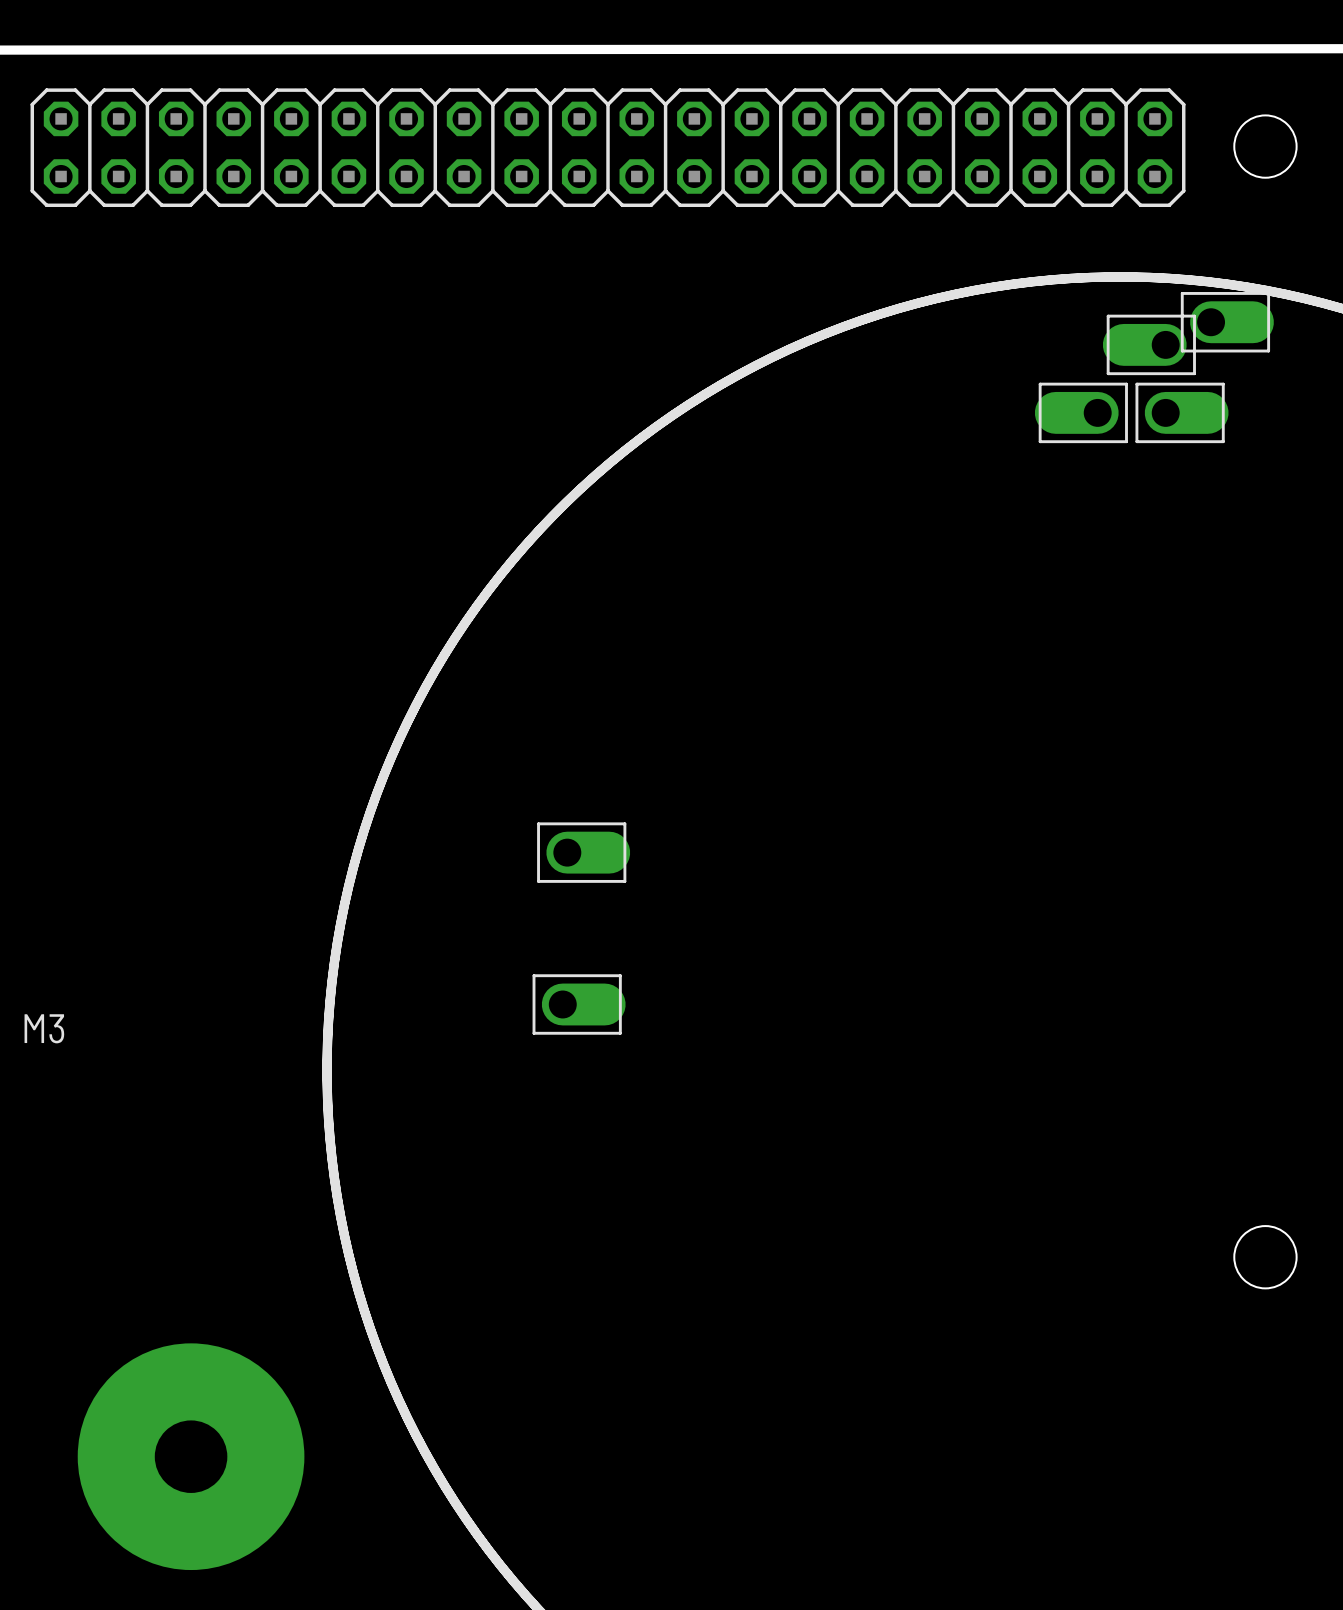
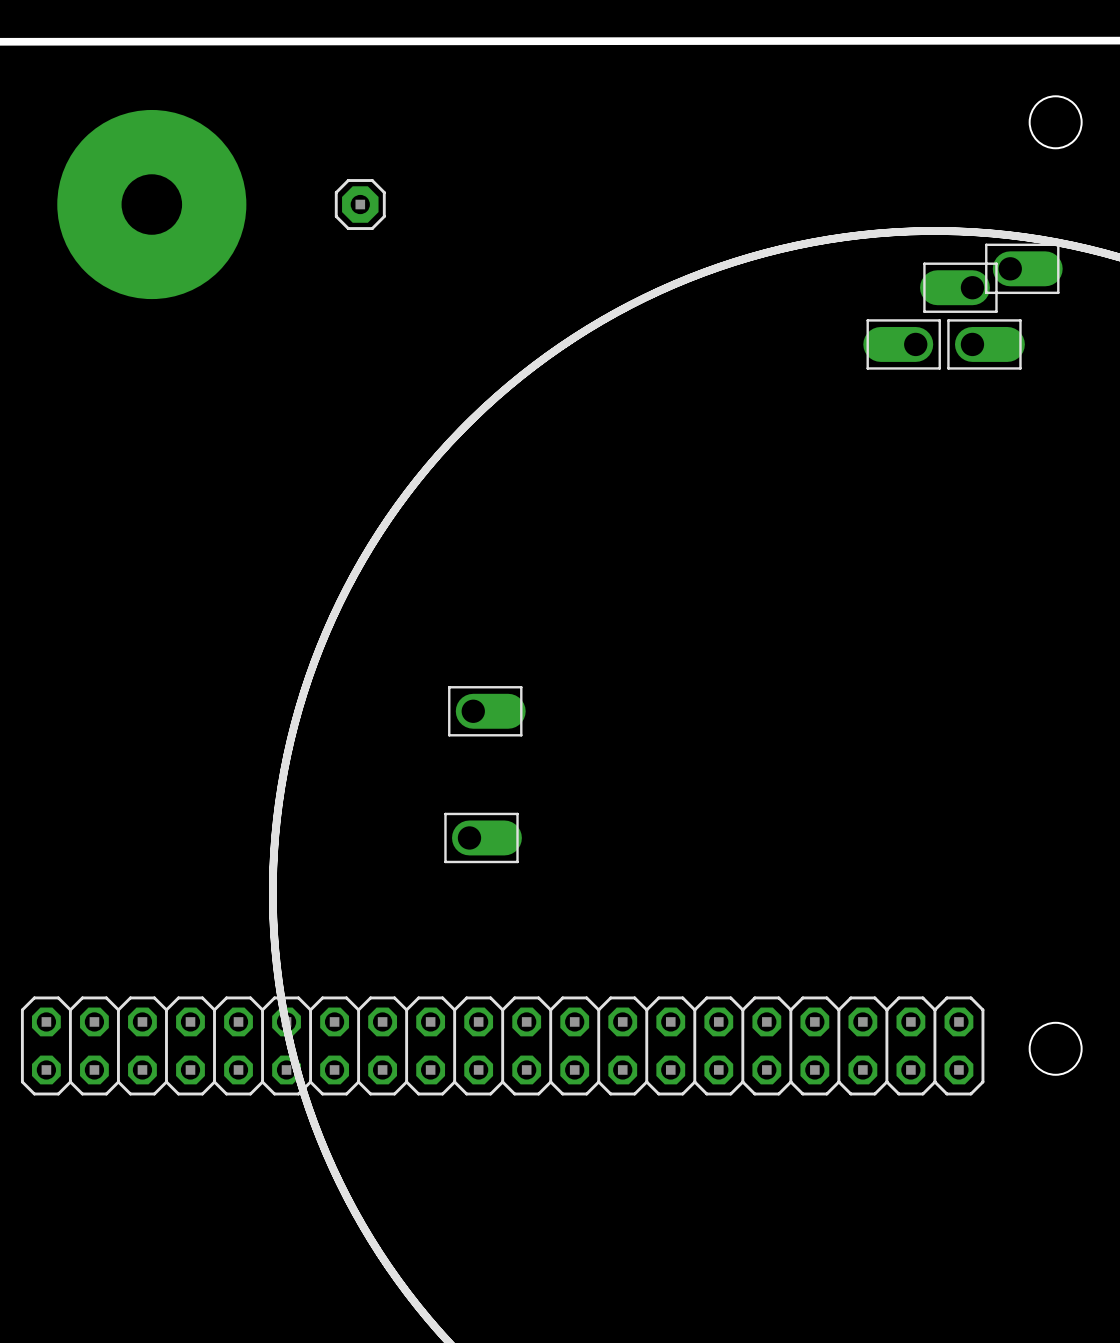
part: (608, 147) -> none
part: none -> (151, 204)
part: none -> (360, 204)
text: M3 (44, 1028) -> none
part: none -> (502, 1045)
part: (191, 1456) -> none

